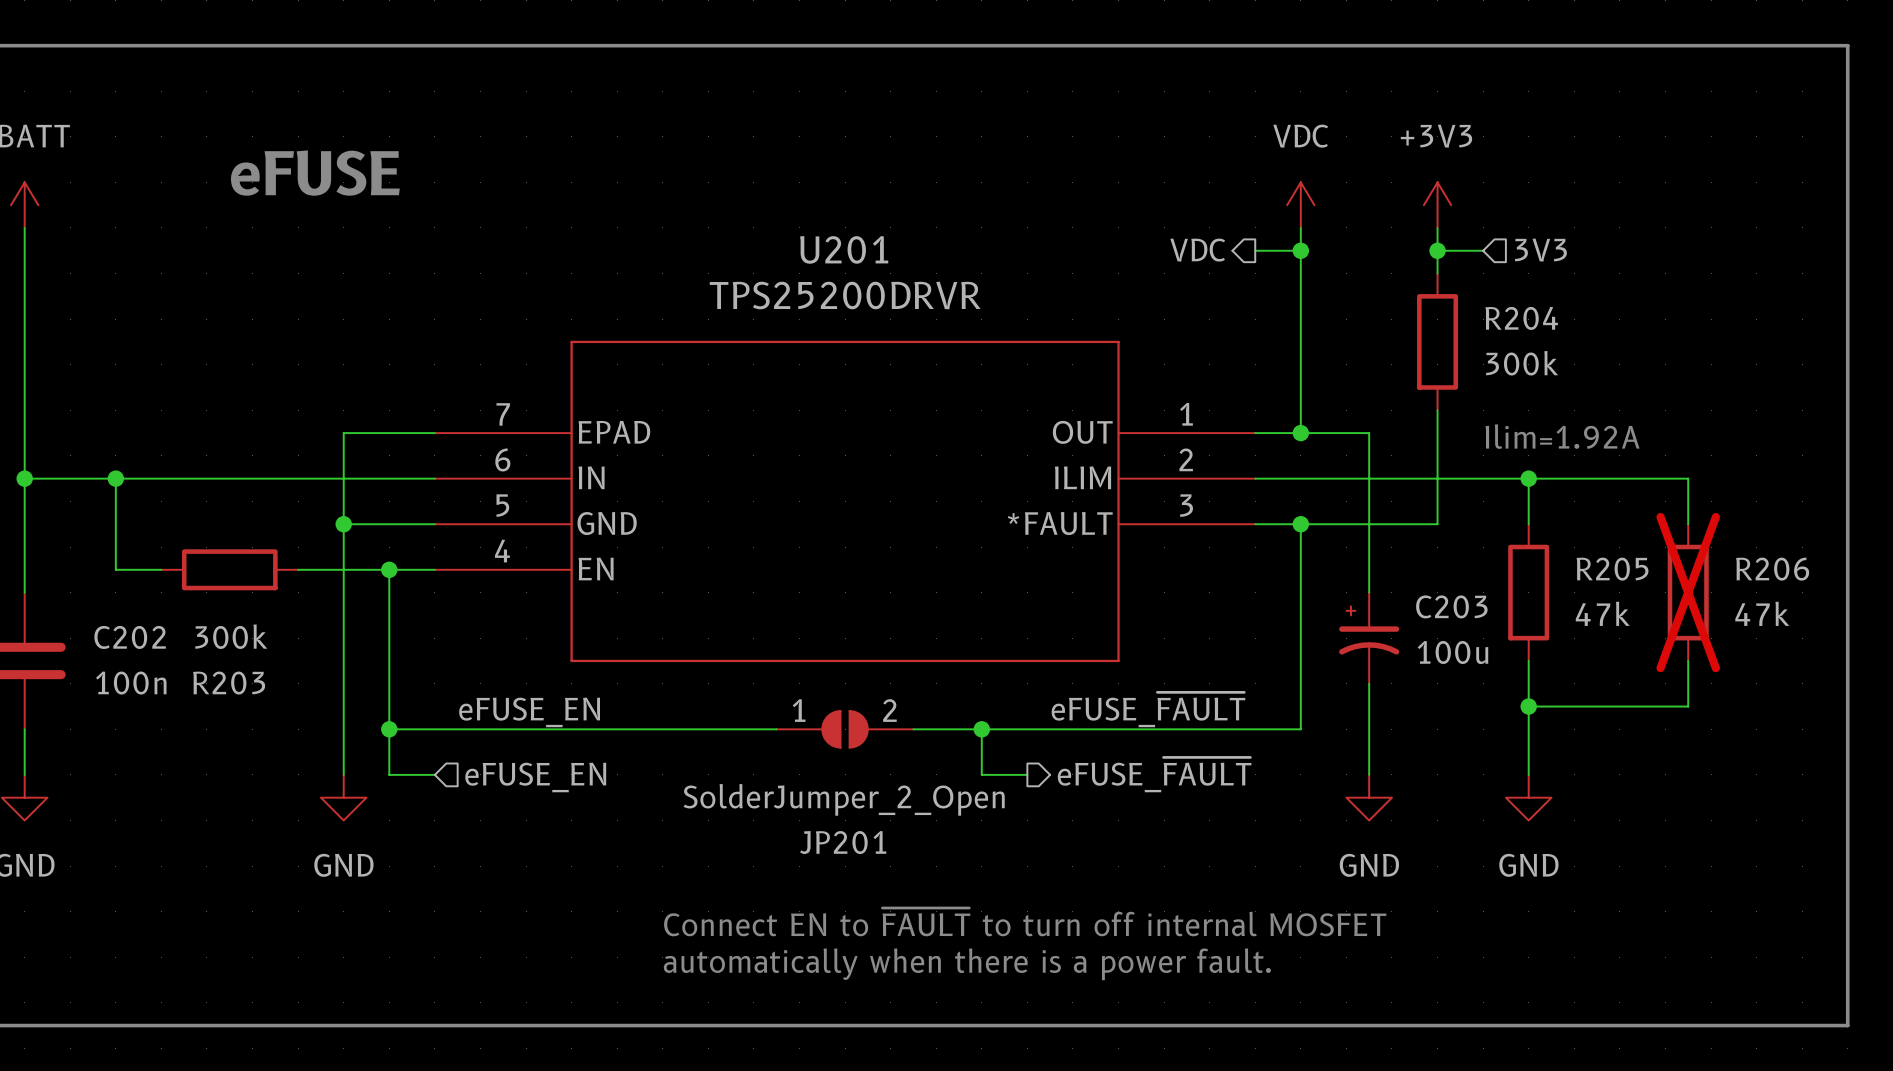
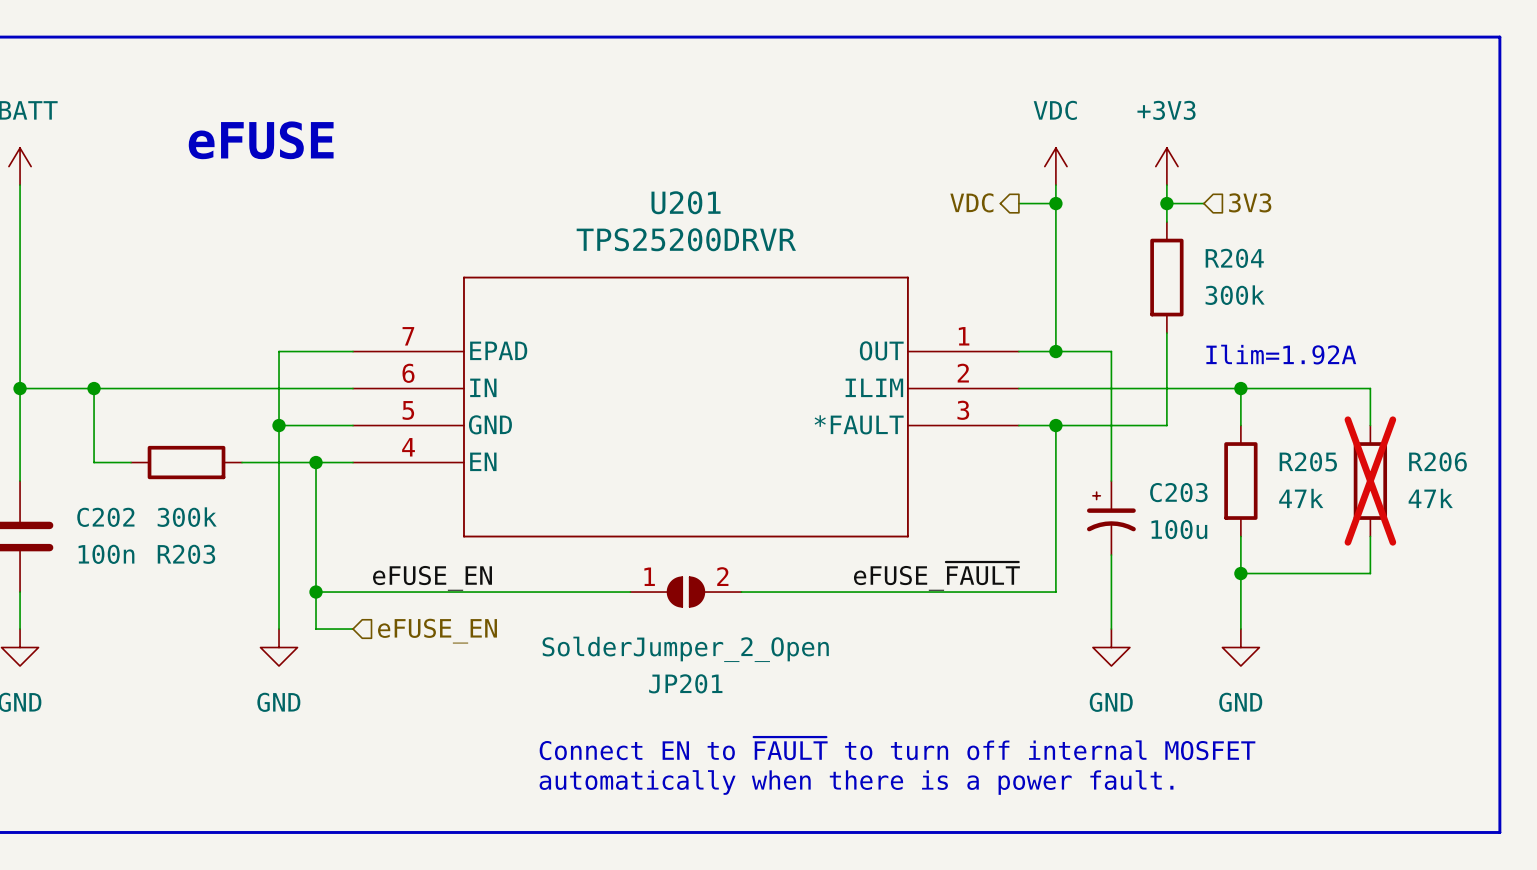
wire: (981, 729) (981, 774) (1027, 774) -> none
junction: (981, 729) -> none
hierarchical label: eFUSE_~{FAULT} (1154, 774) -> none

